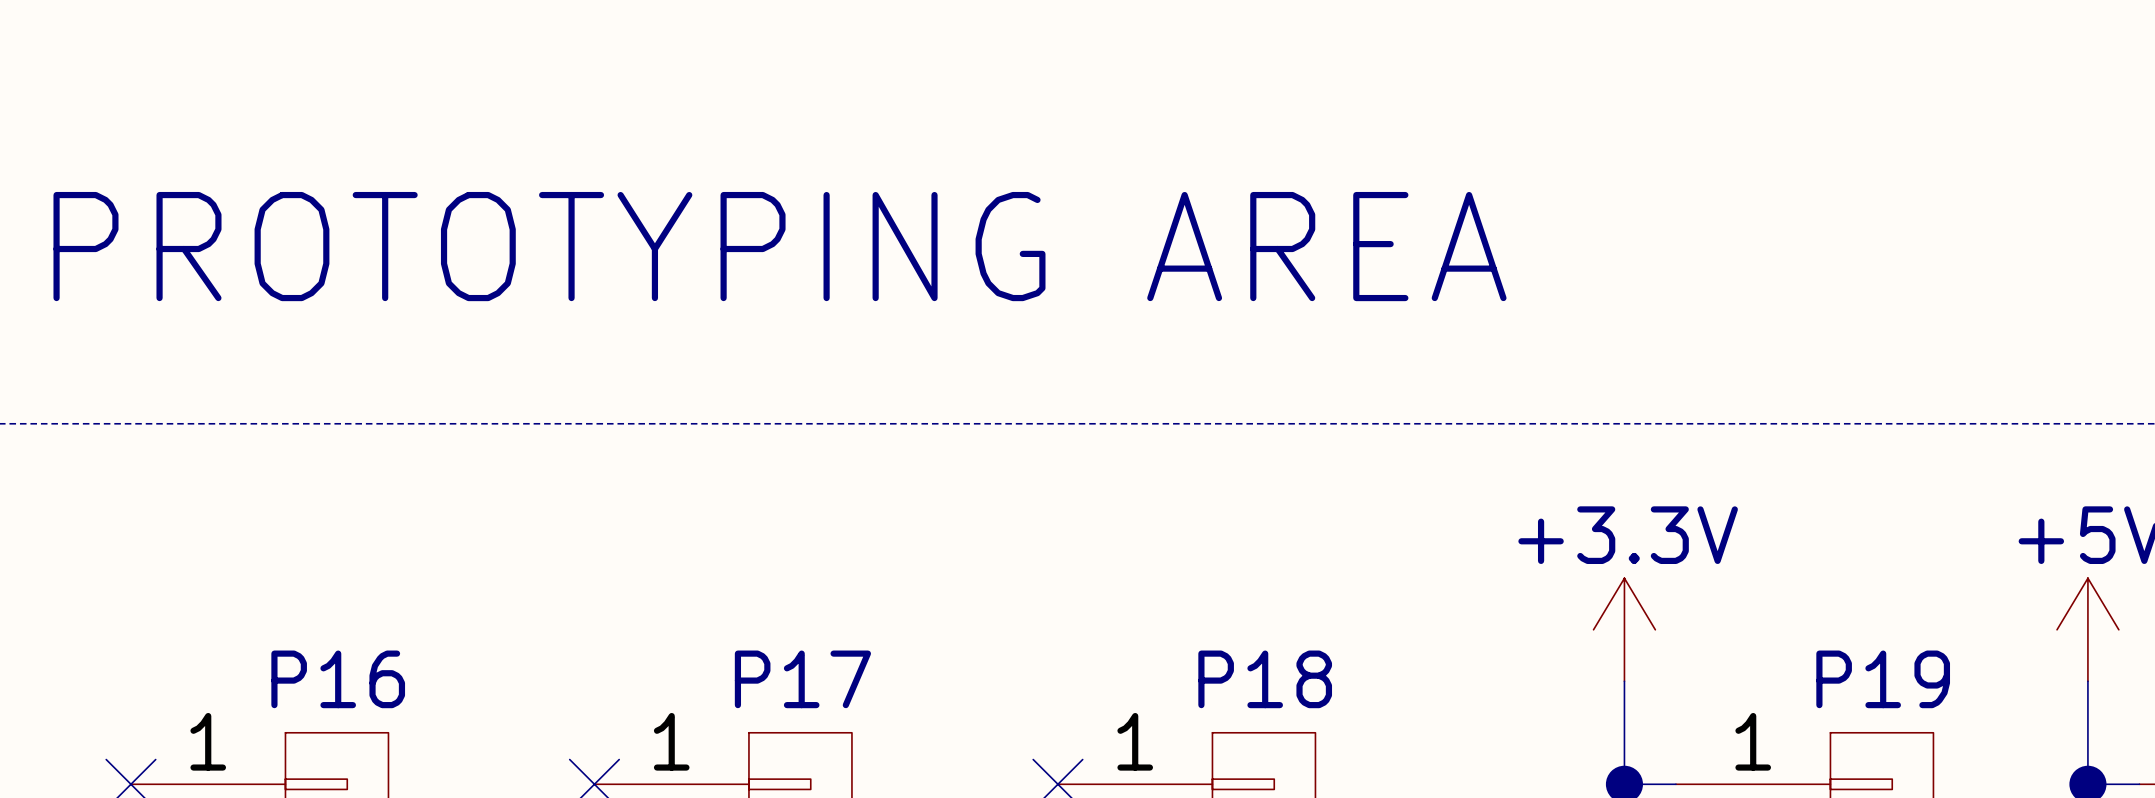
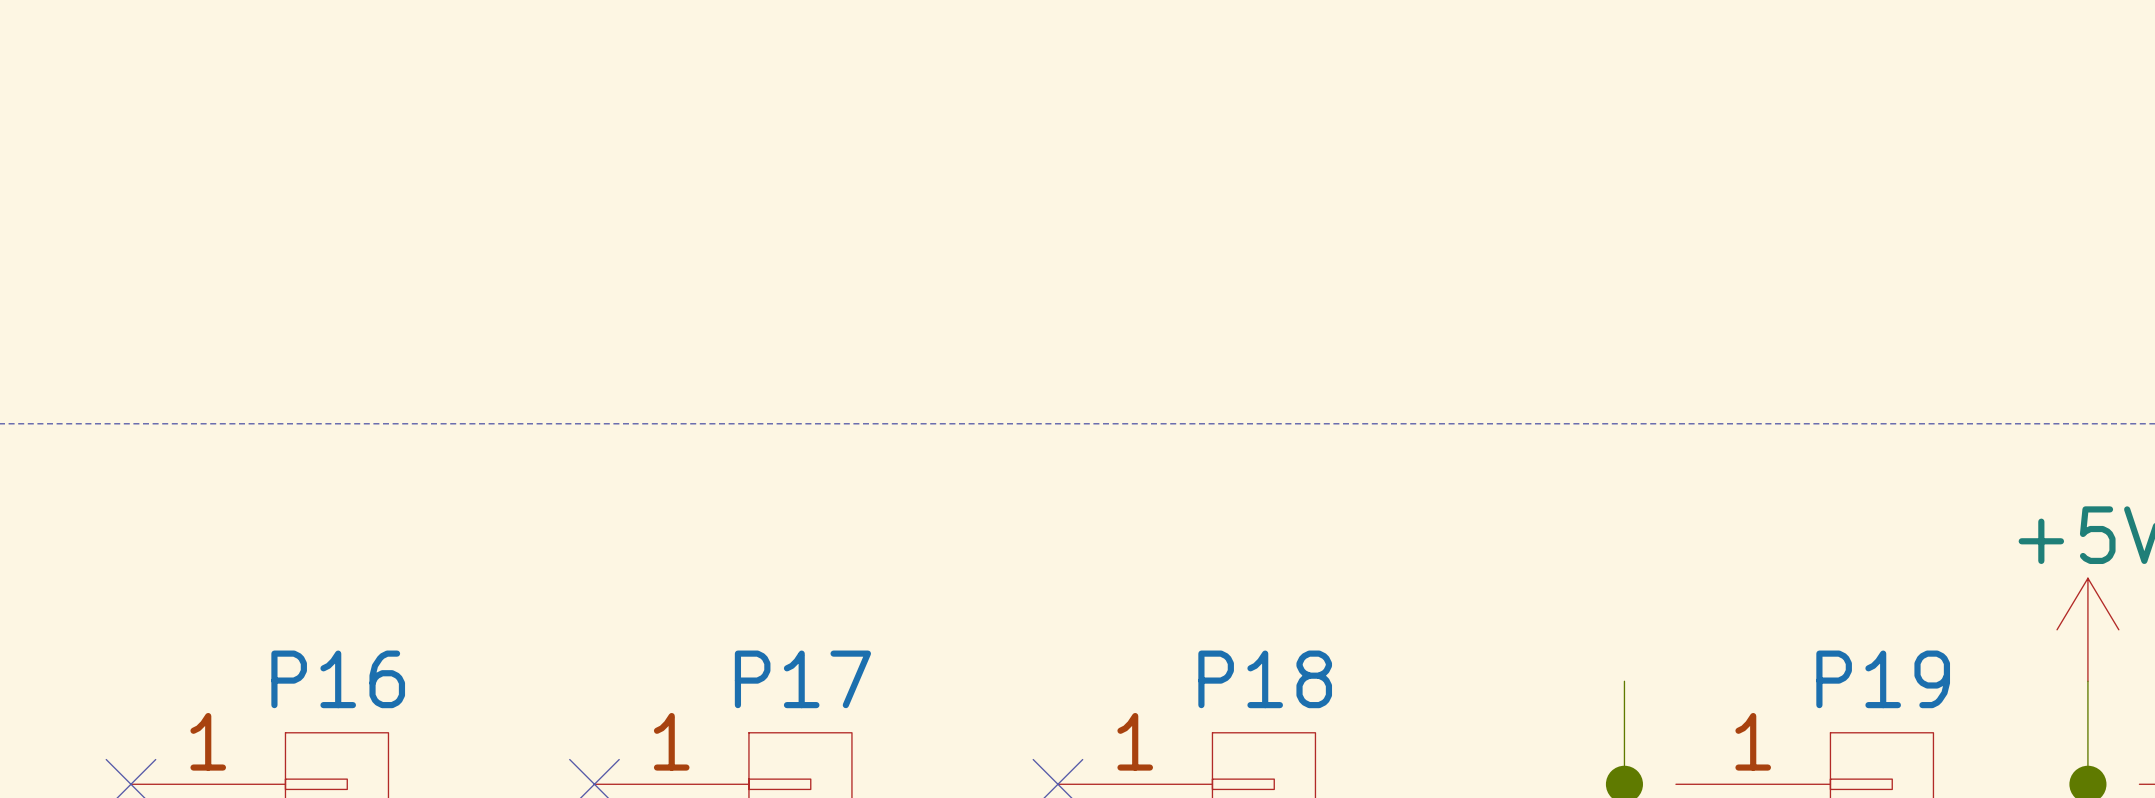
text: PROTOTYPING AREA (780, 246) -> none
power symbol: +3.3V (1624, 629) -> none
wire: (1624, 784) (1675, 784) -> none
wire: (2087, 784) (2139, 784) -> none

